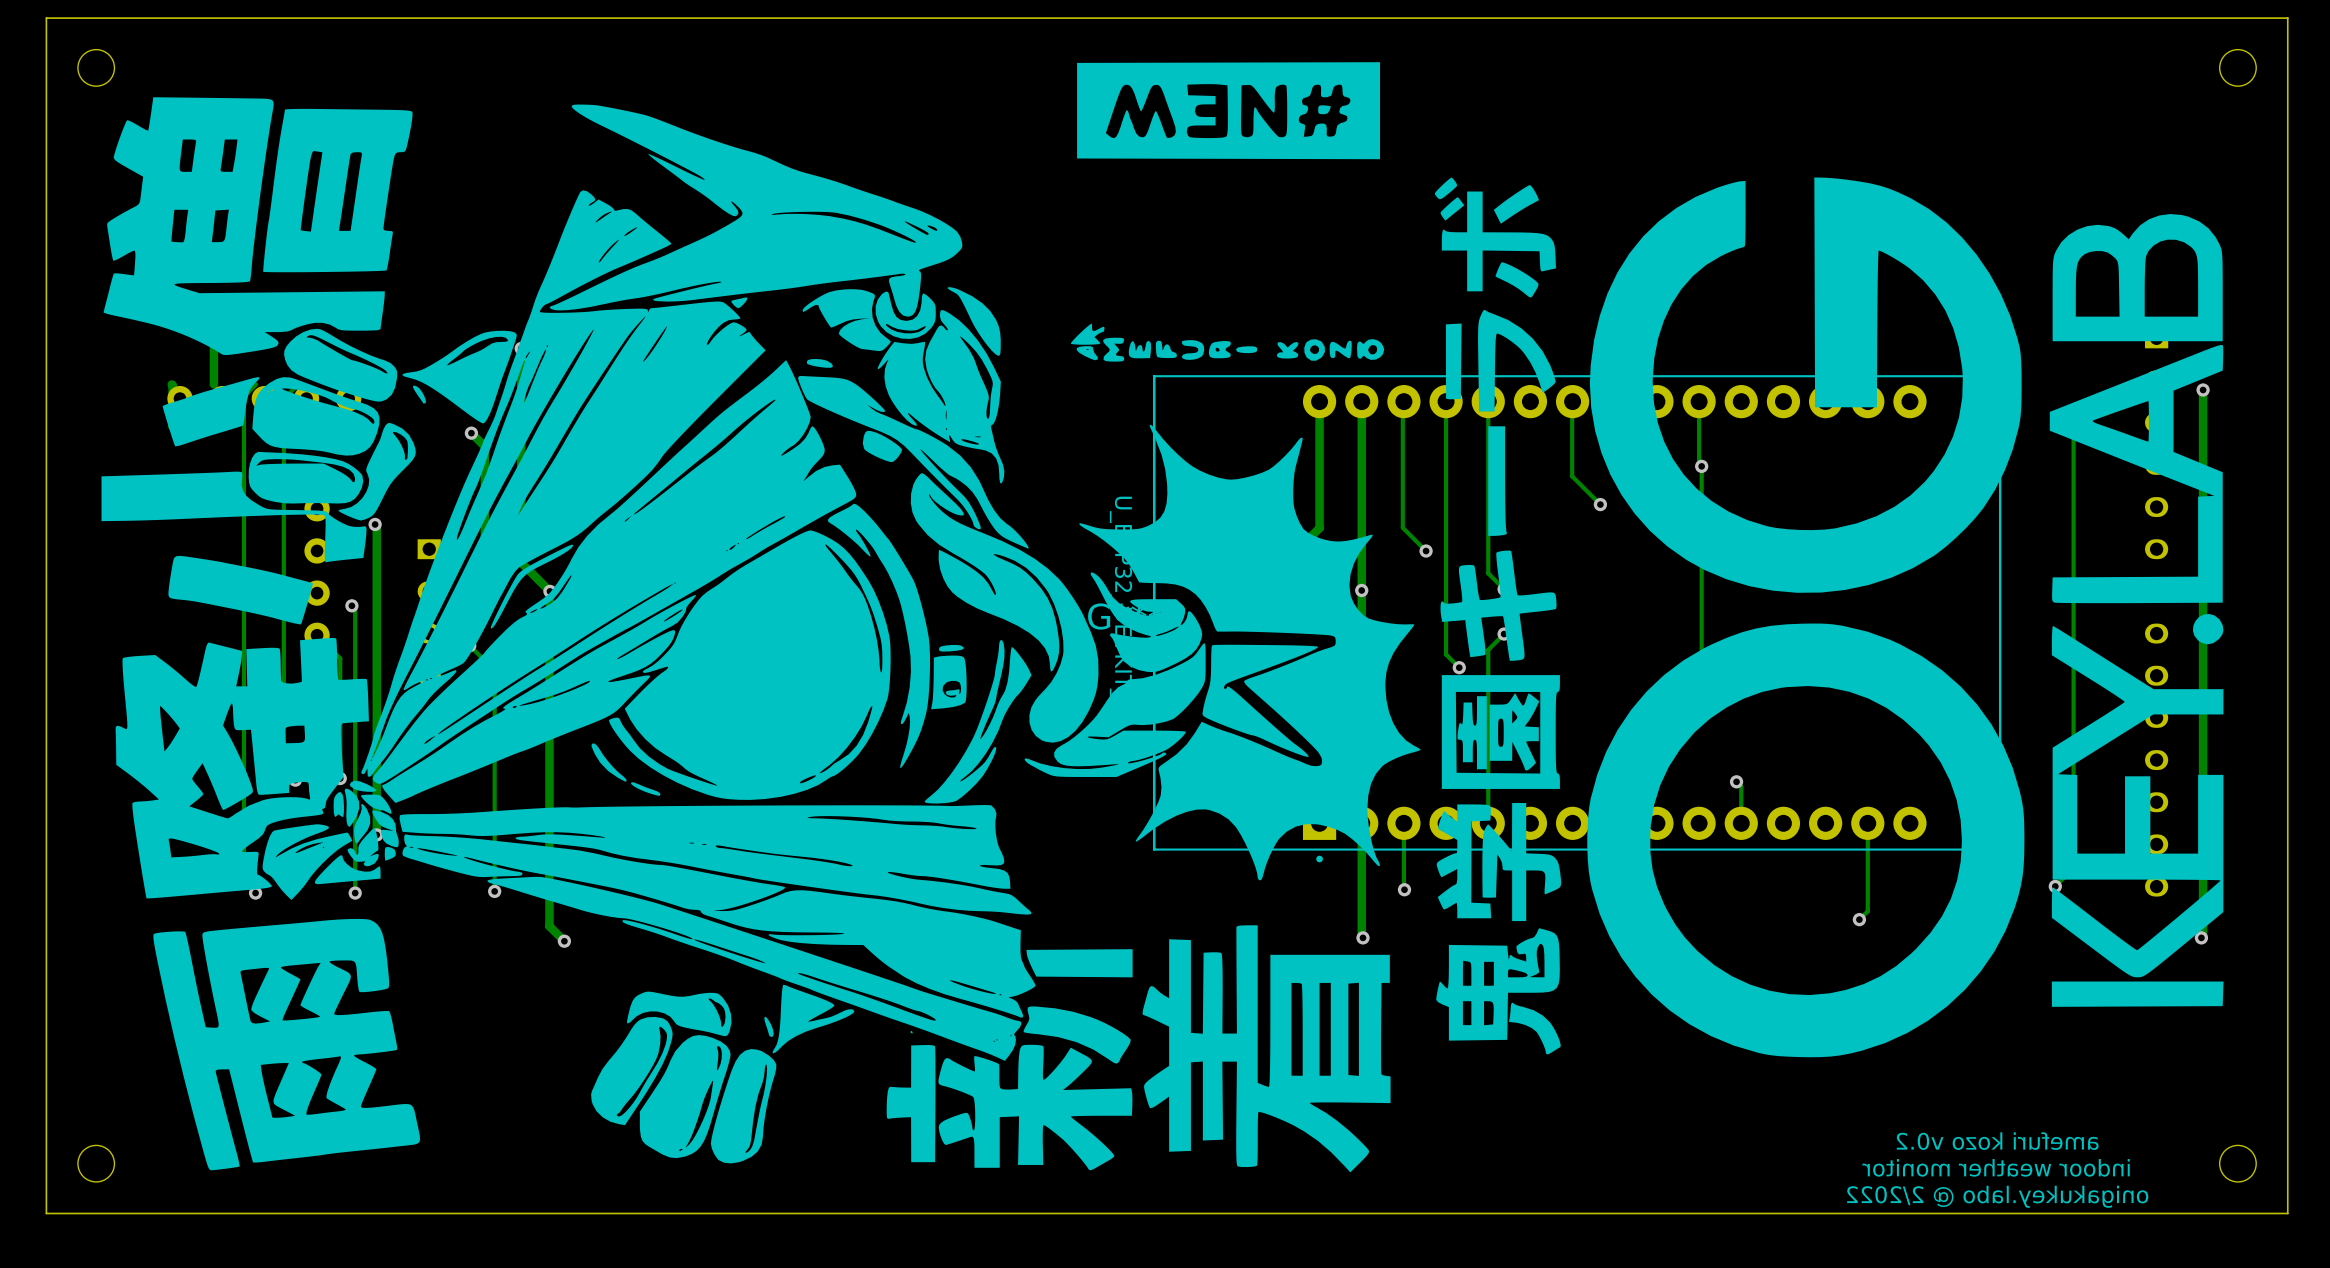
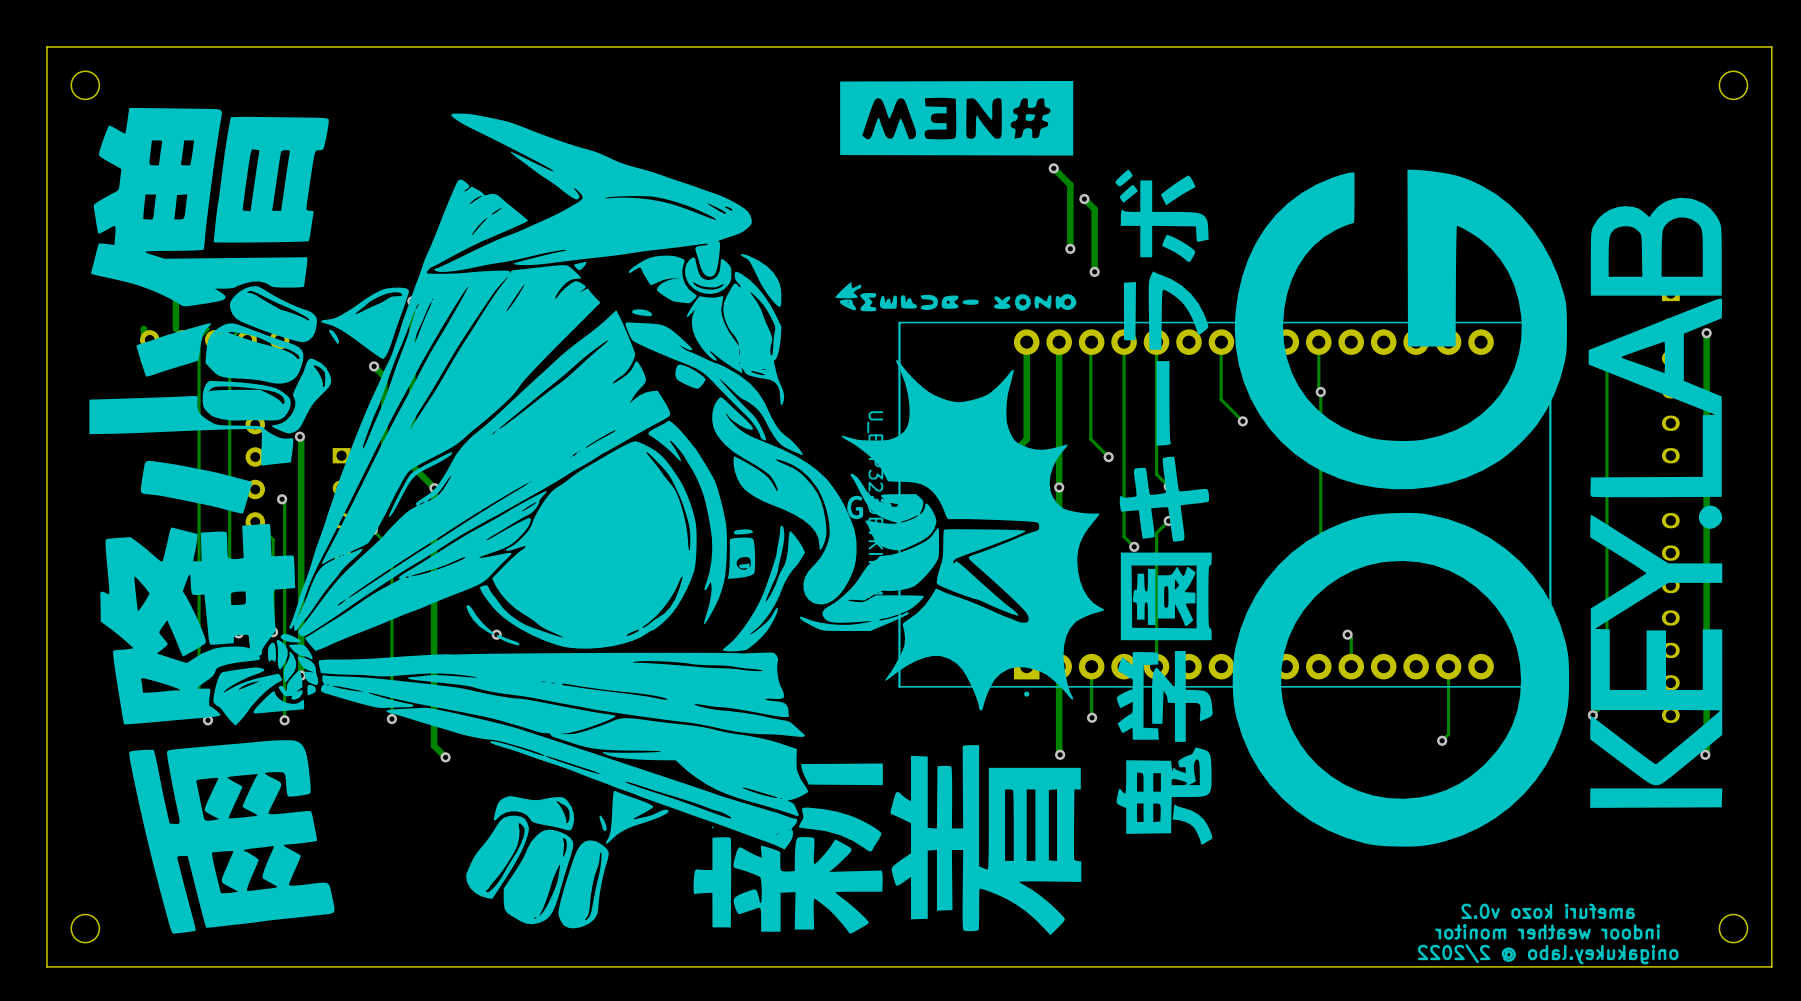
track: none -> (1053, 168) (1070, 184) (1070, 248)
via: none -> (1053, 168)
track: none -> (1084, 199) (1094, 209) (1094, 271)
via: none -> (1084, 199)
via: none -> (1070, 248)
via: none -> (1094, 271)
via: none -> (496, 634)

